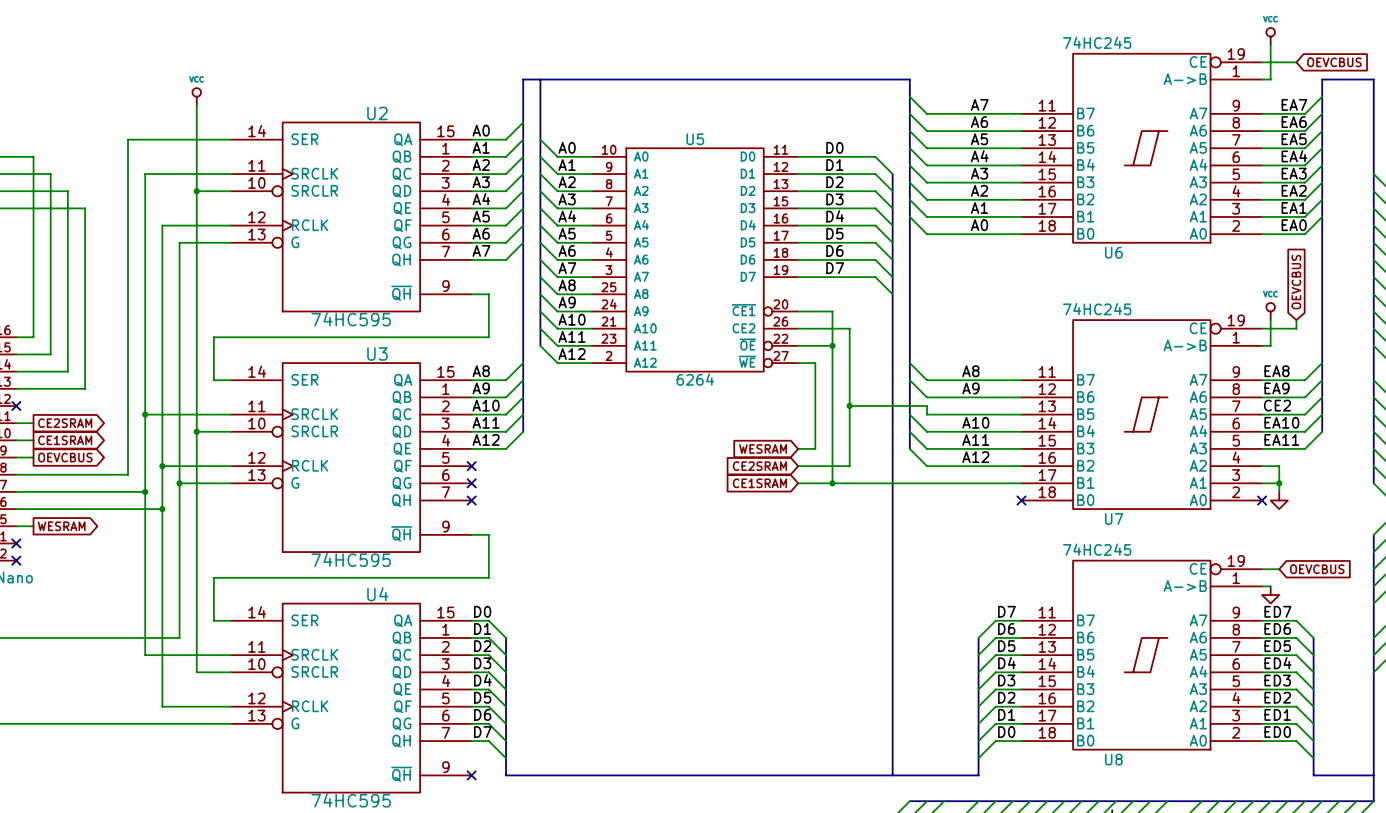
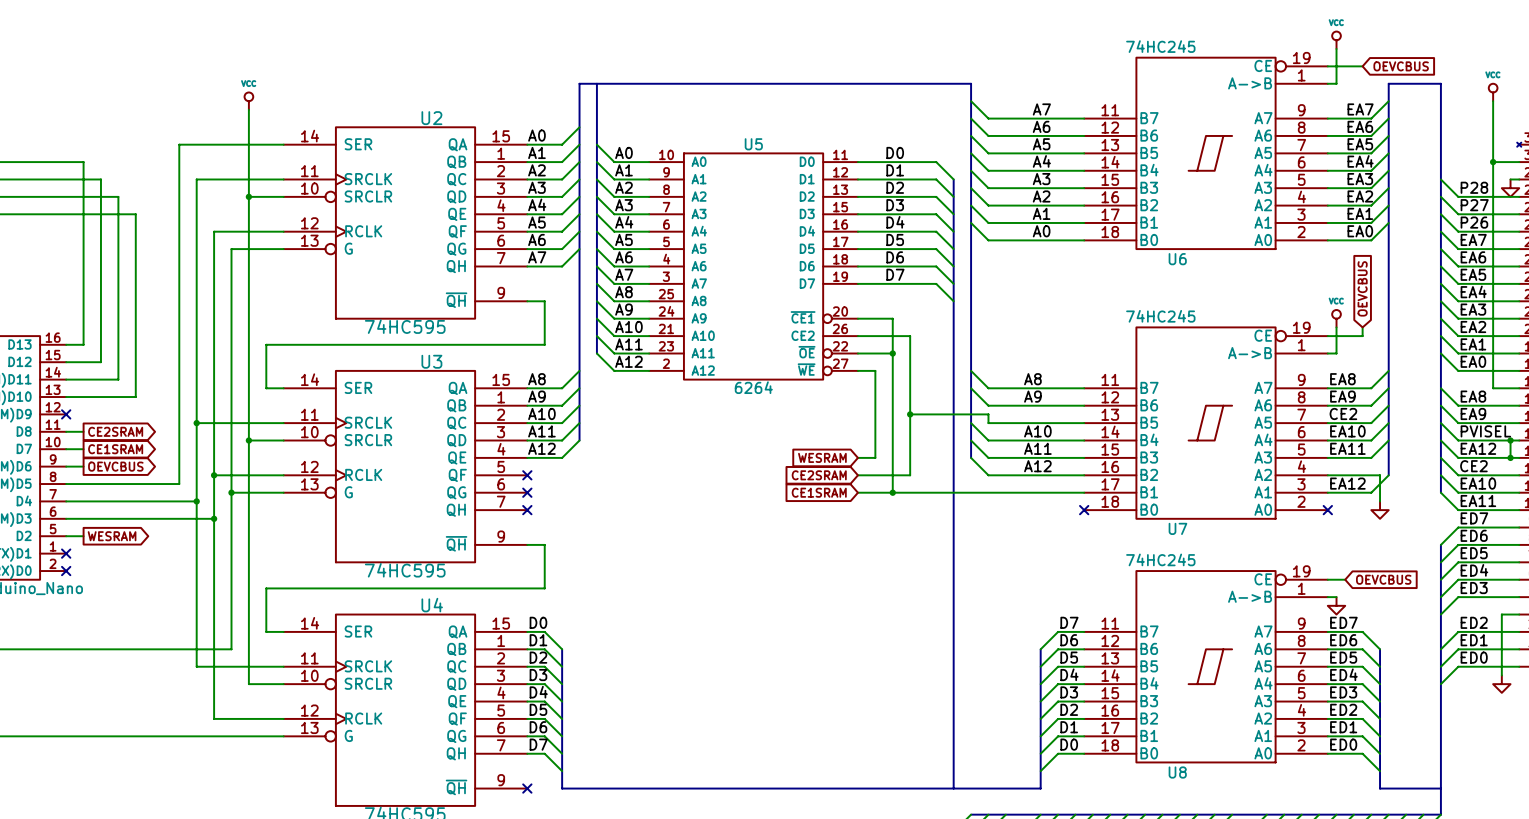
bus: none -> (1388, 440) (1388, 475)
wire: (1279, 466) (1279, 491) -> (1345, 475) (1380, 475) (1380, 501)
wire: none -> (1388, 475) (1371, 492) (1345, 492)
label: none -> EA12 (1347, 483)
junction: (1279, 483) -> none
power symbol position: (1279, 500) -> (1380, 510)

